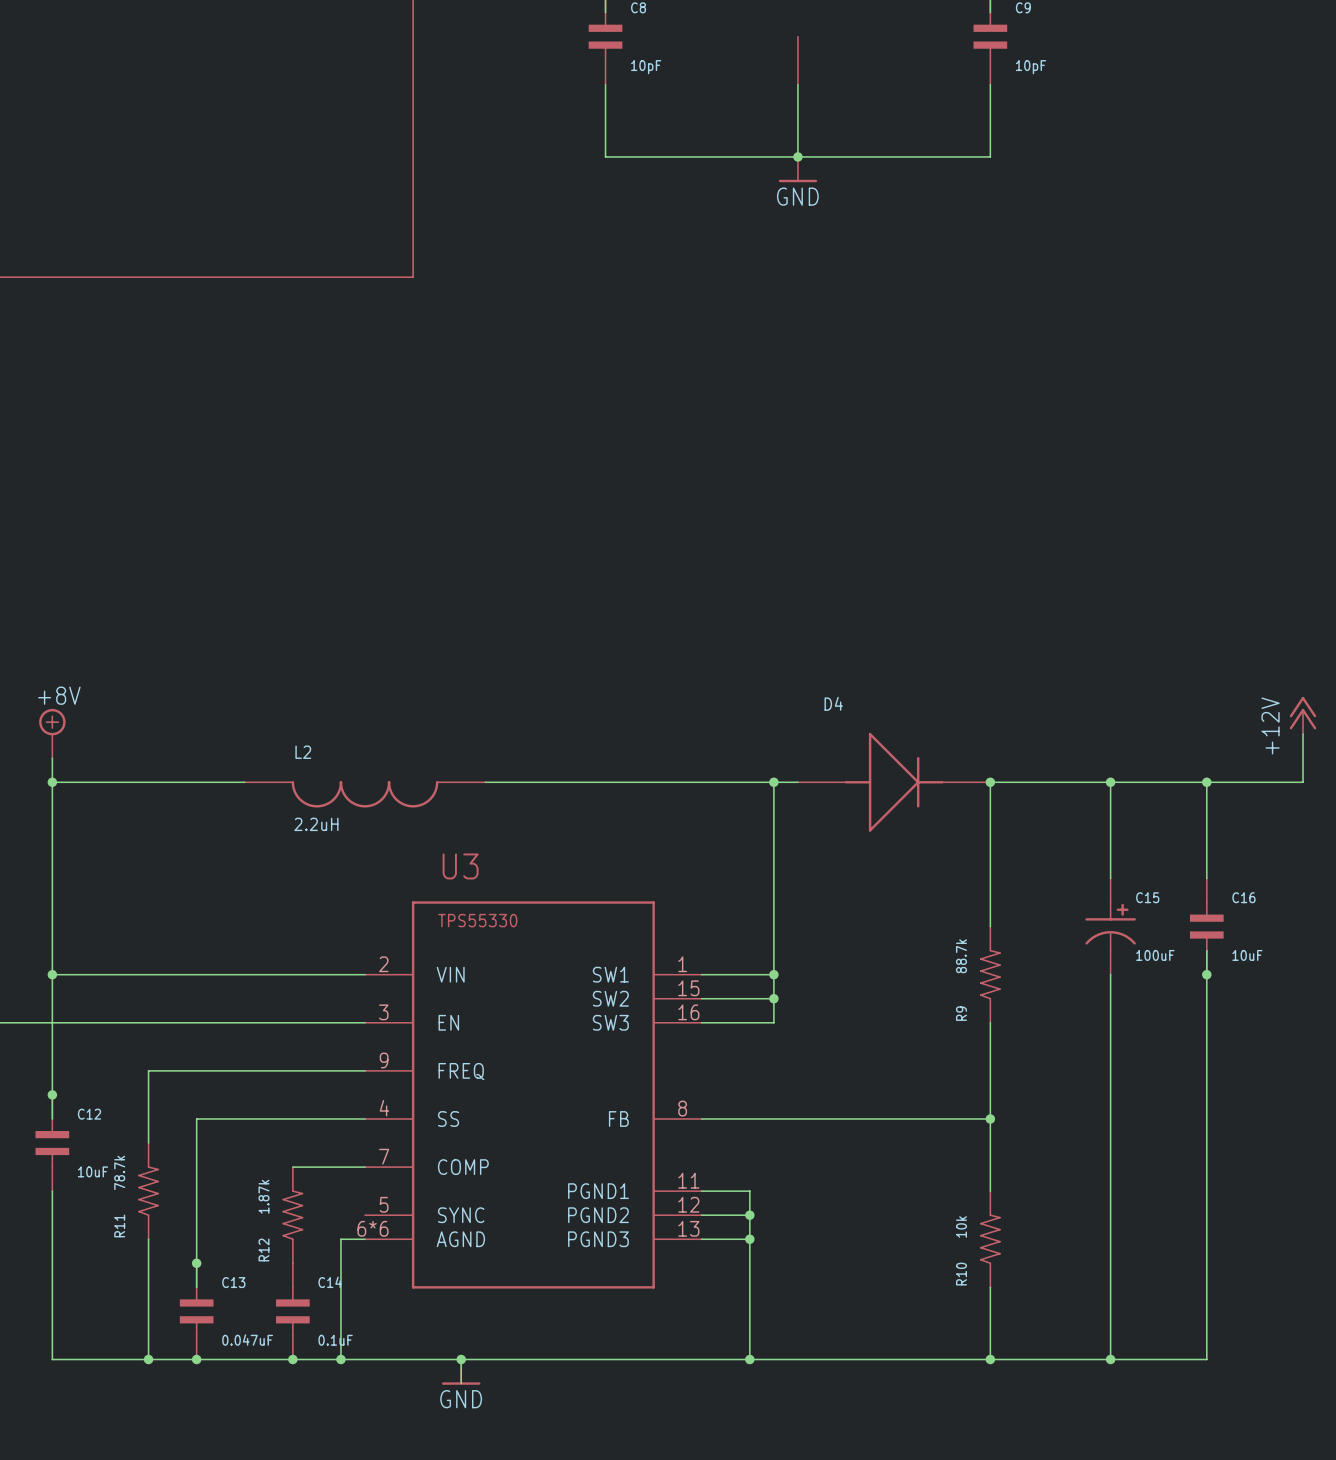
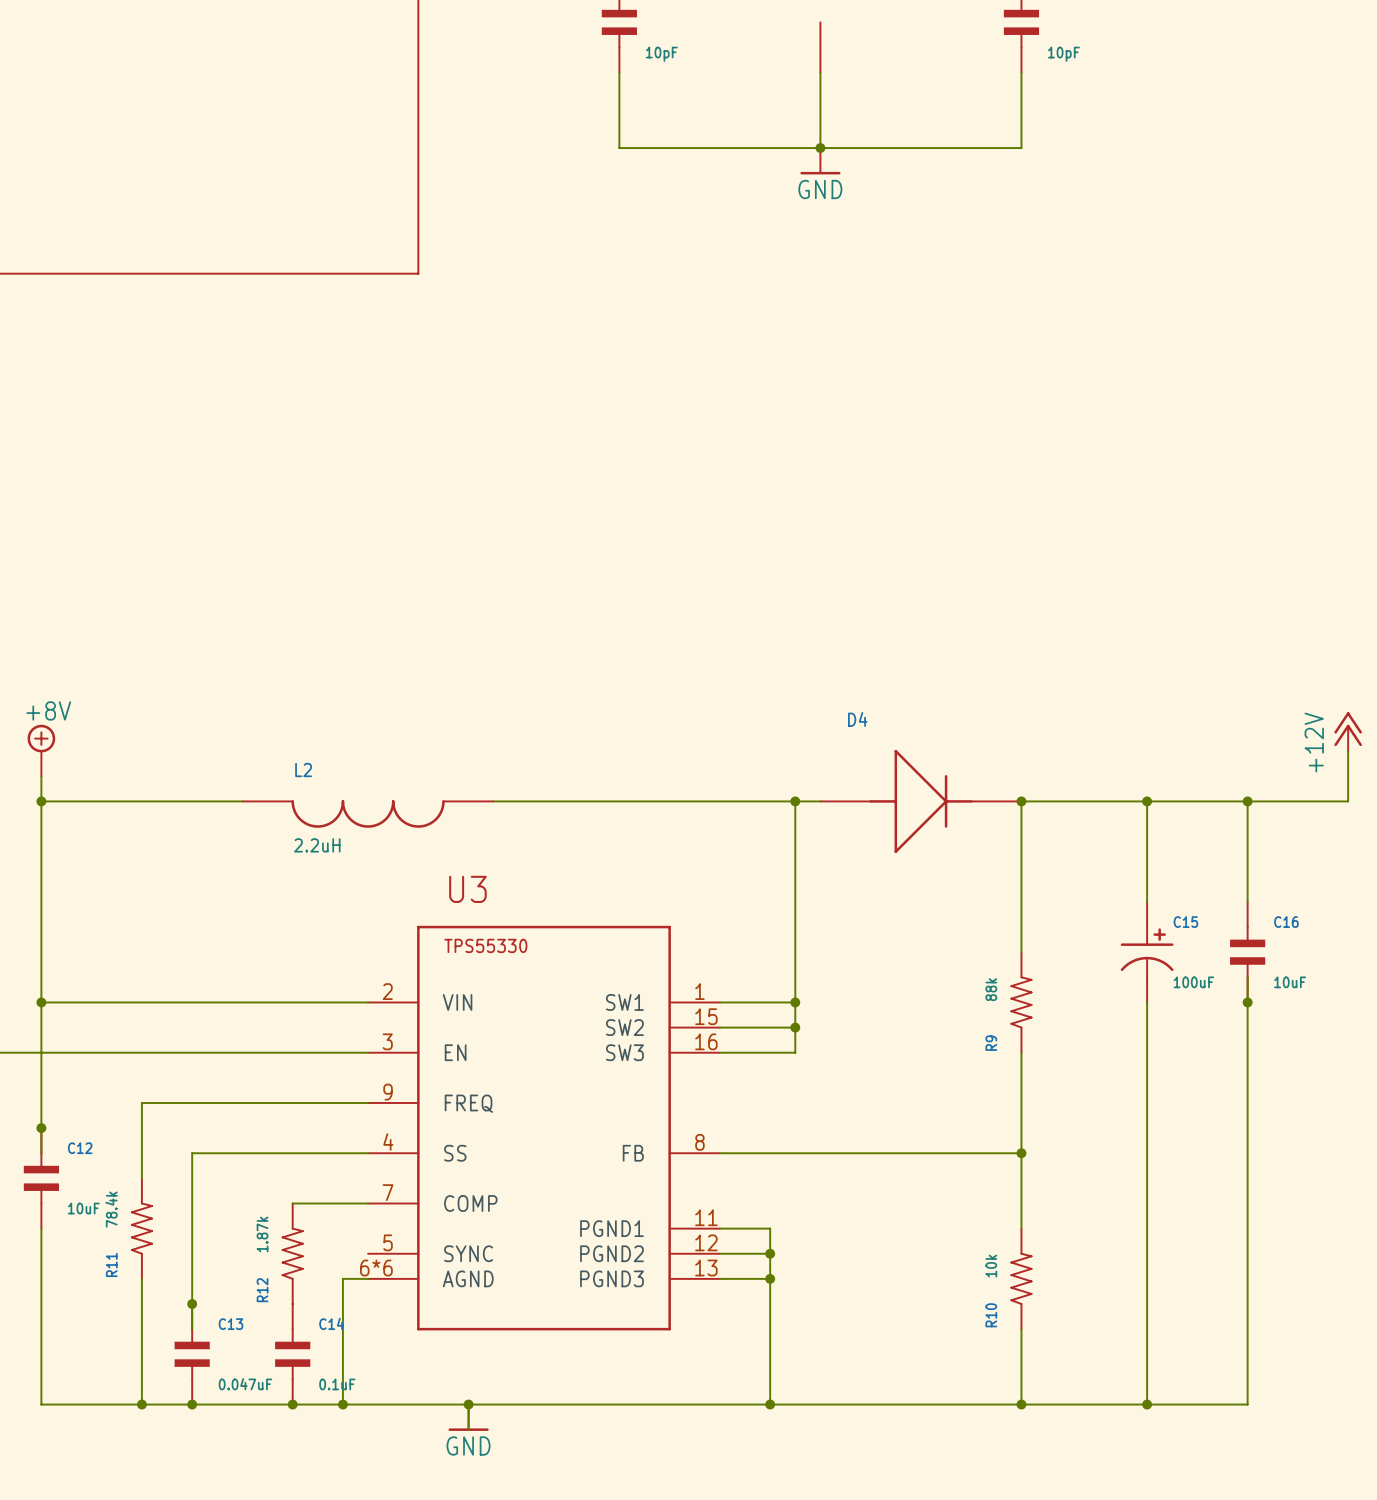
R9 value: 88.7k (961, 956) -> 88k (991, 989)
R11 value: 78.7k (119, 1172) -> 78.4k (111, 1209)

